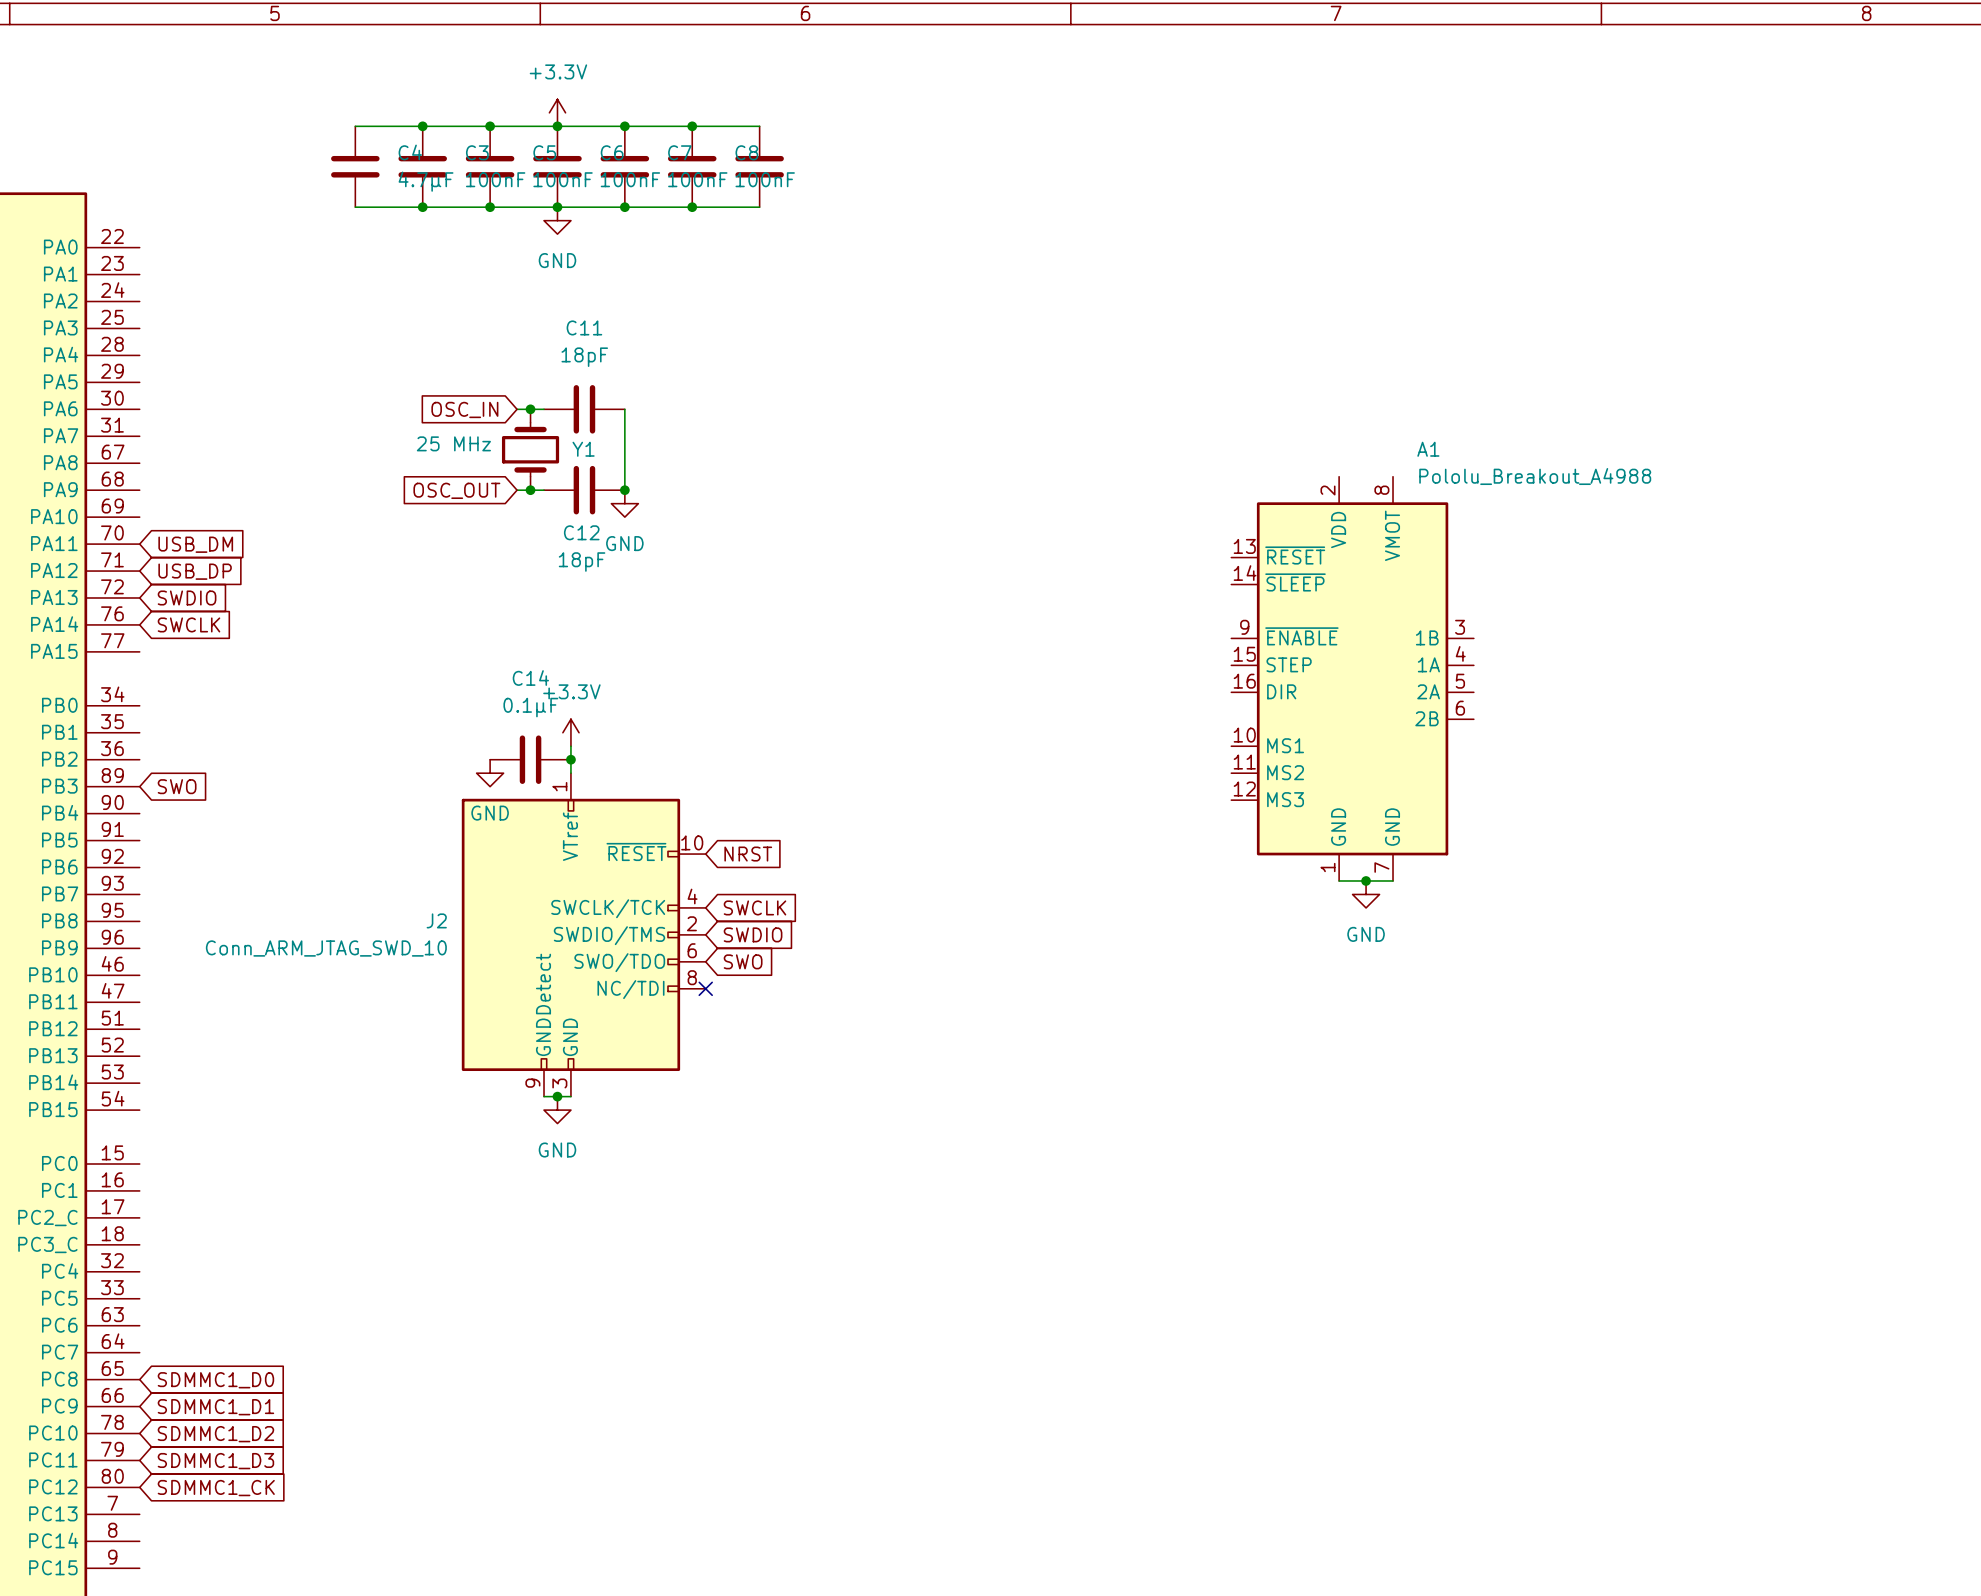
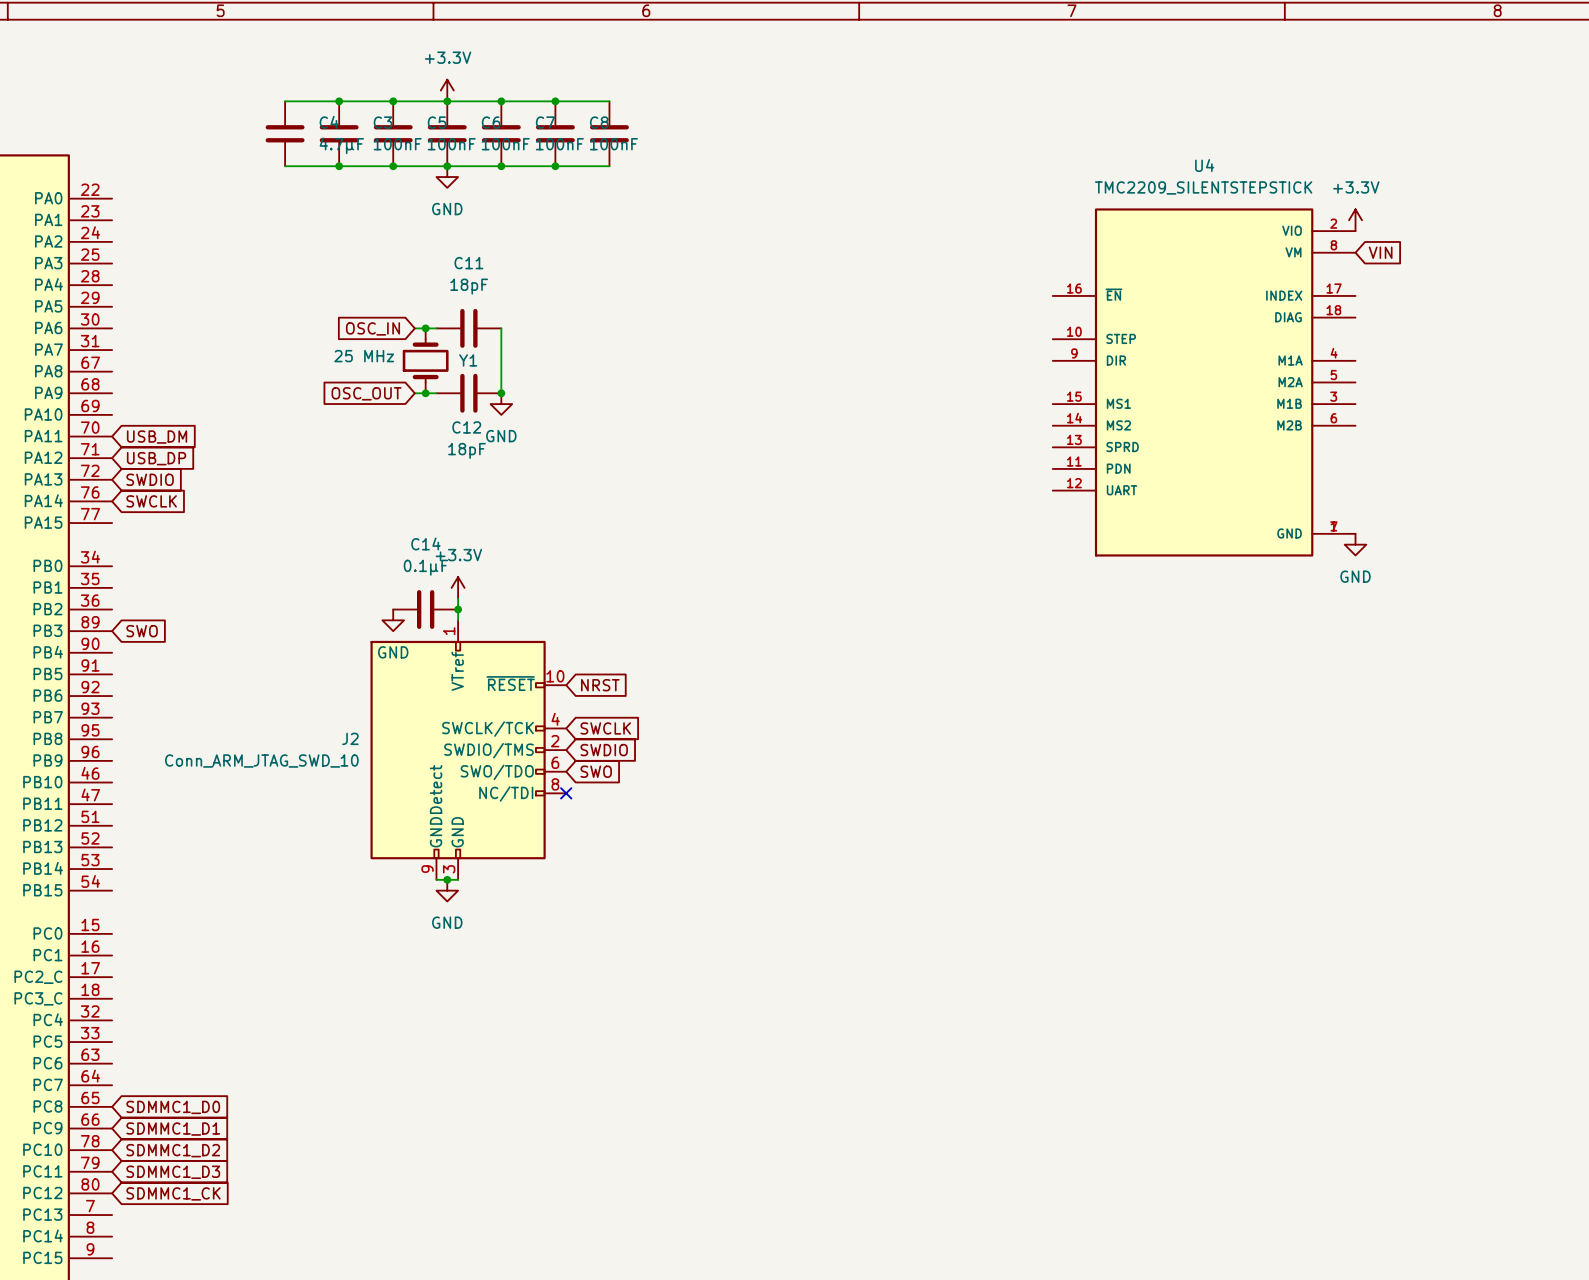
power symbol: none -> +3.3V (1355, 220)
global label: none -> VIN (1380, 252)
U4: none -> TMC2209_SILENTSTEPSTICK (1204, 382)
A1: Pololu_Breakout_A4988 (1352, 678) -> none
power symbol: none -> GND (1355, 544)
wire: (1339, 880) (1393, 880) -> none
junction: (1366, 880) -> none
power symbol: GND (1366, 894) -> none

